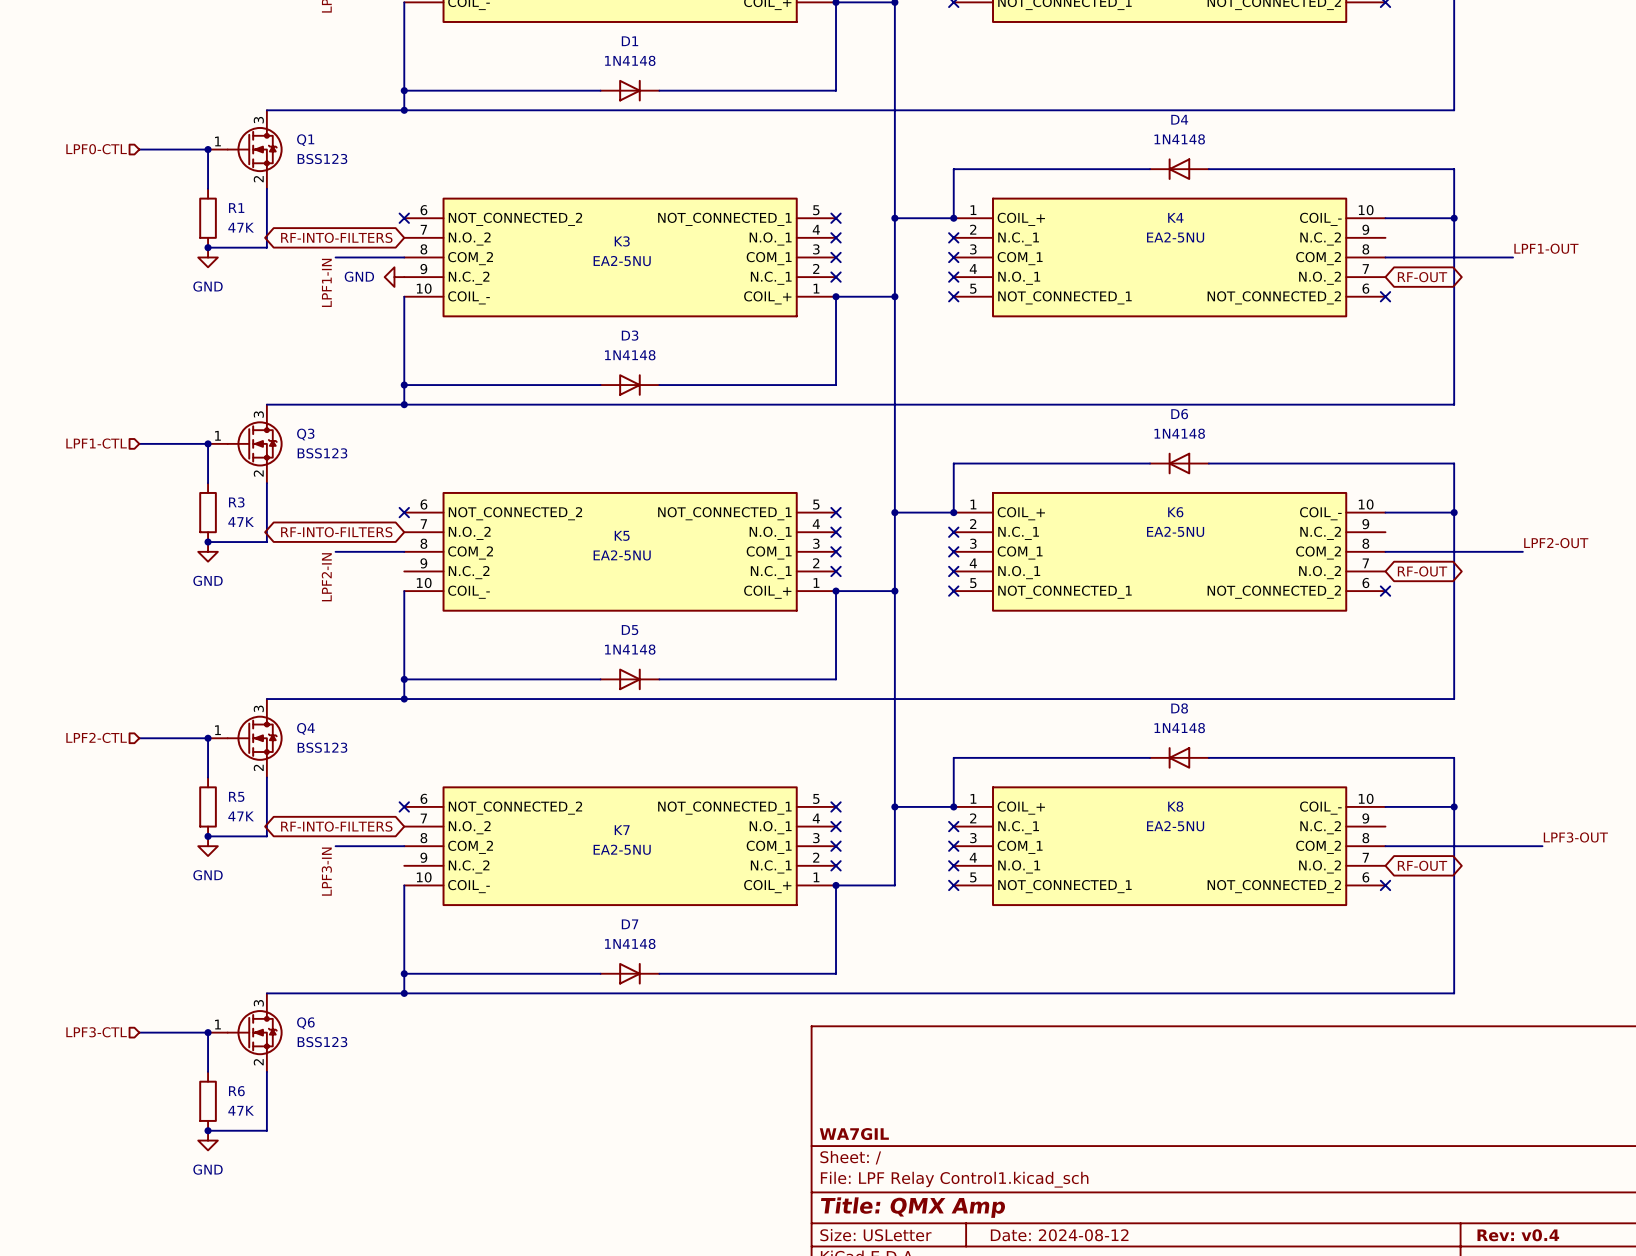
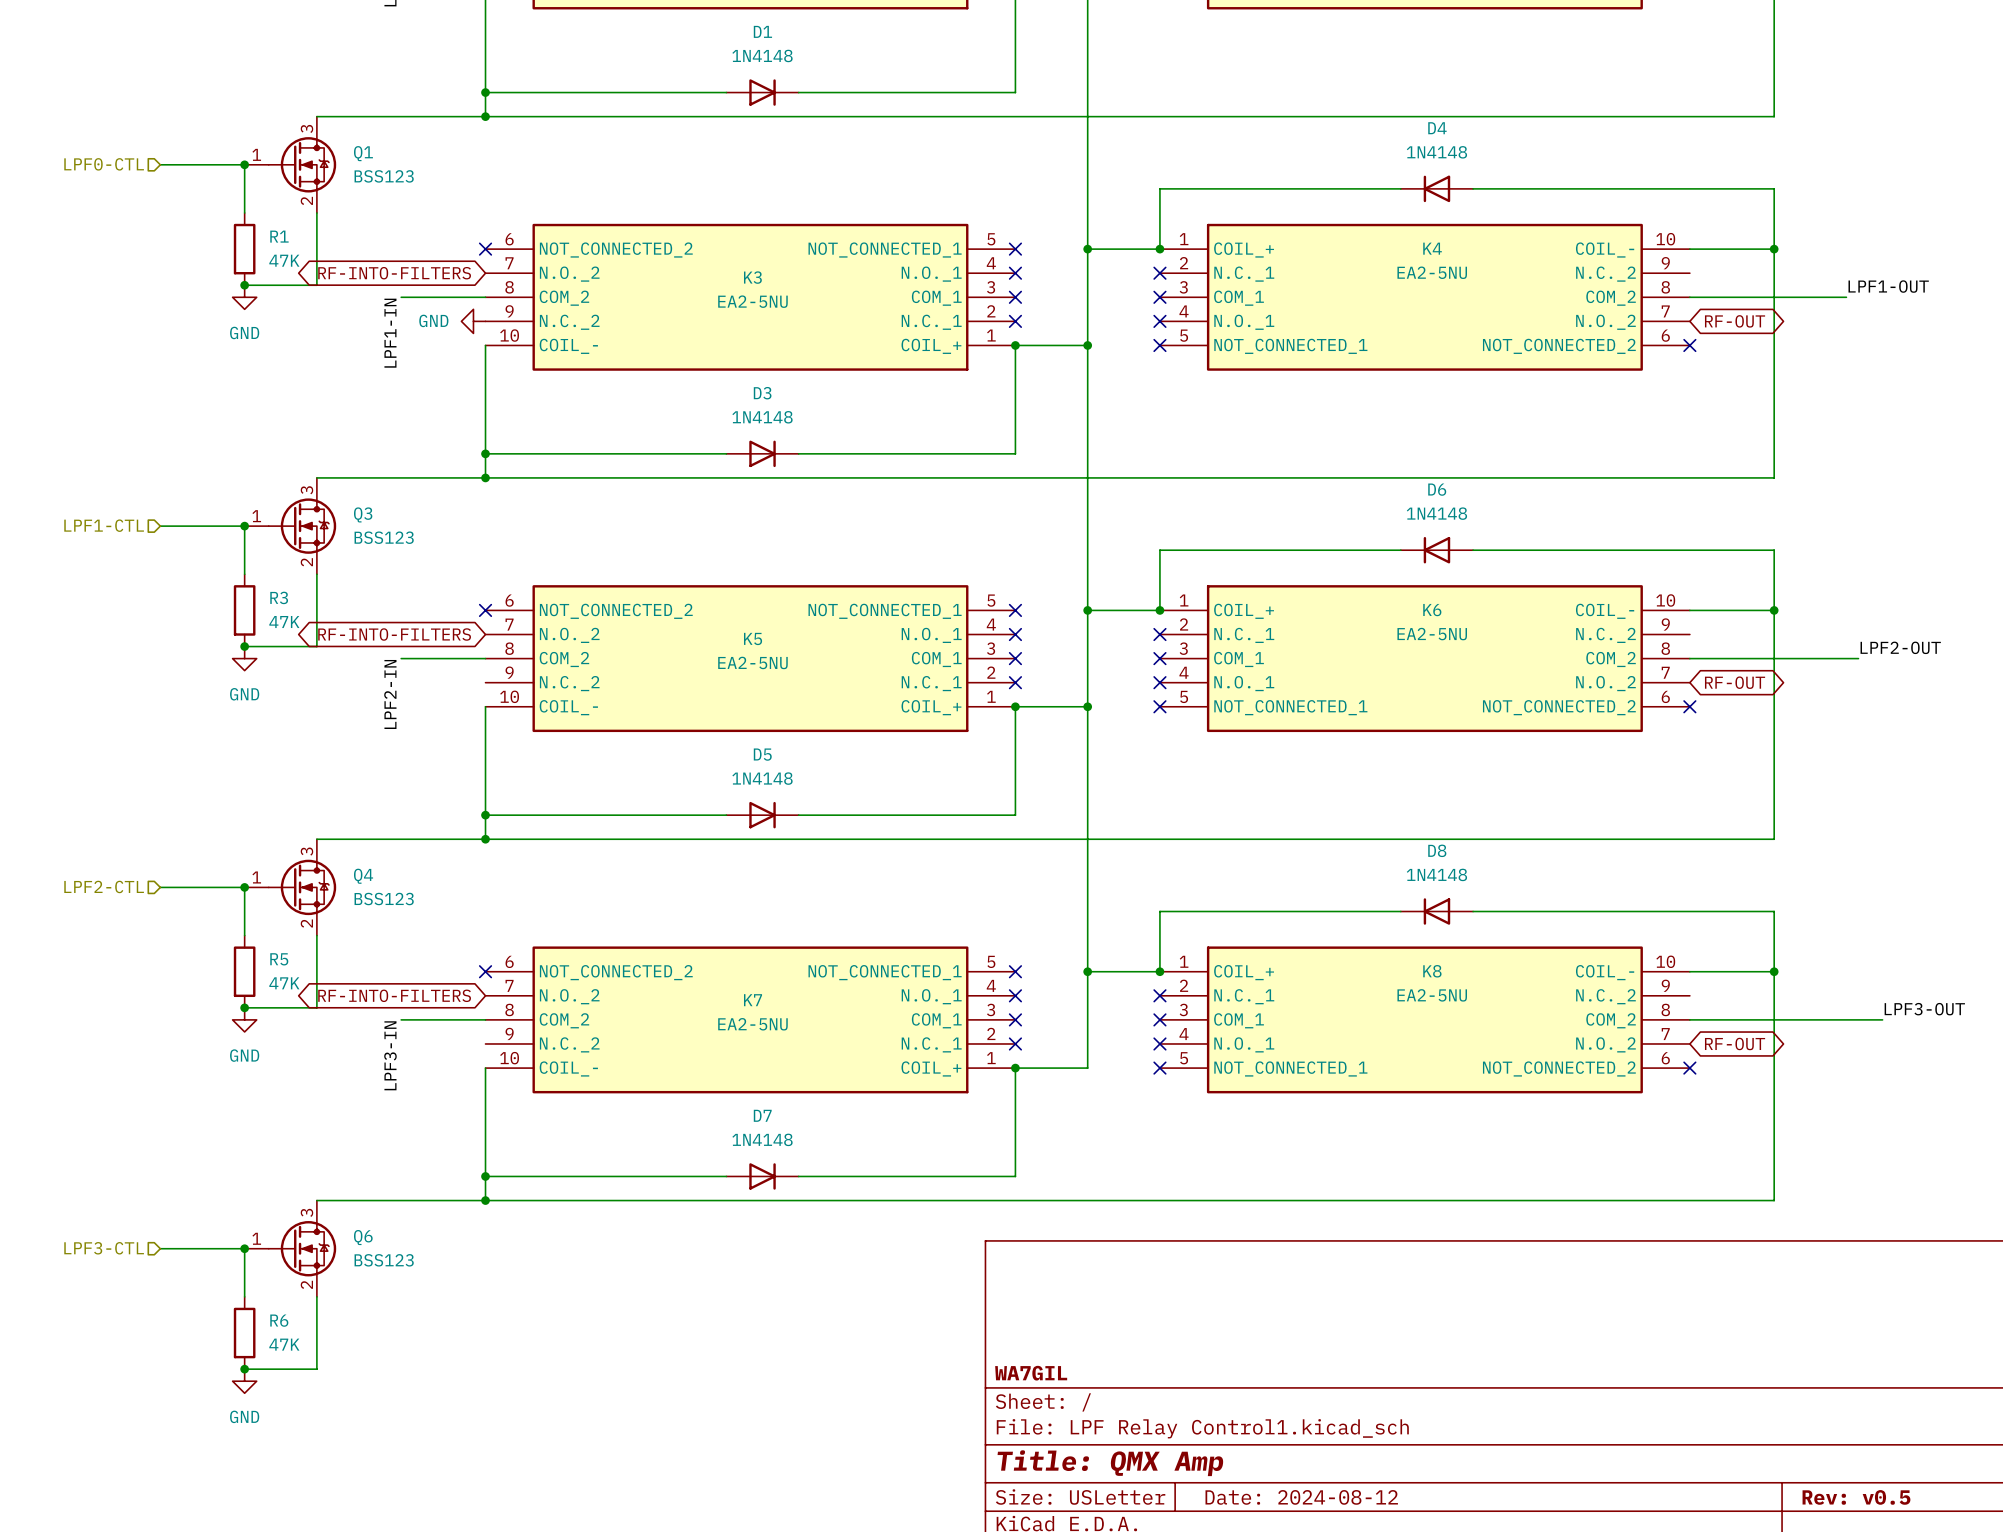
title block: Rev: v0.4 (1518, 1235) -> Rev: v0.5 (1856, 1497)

